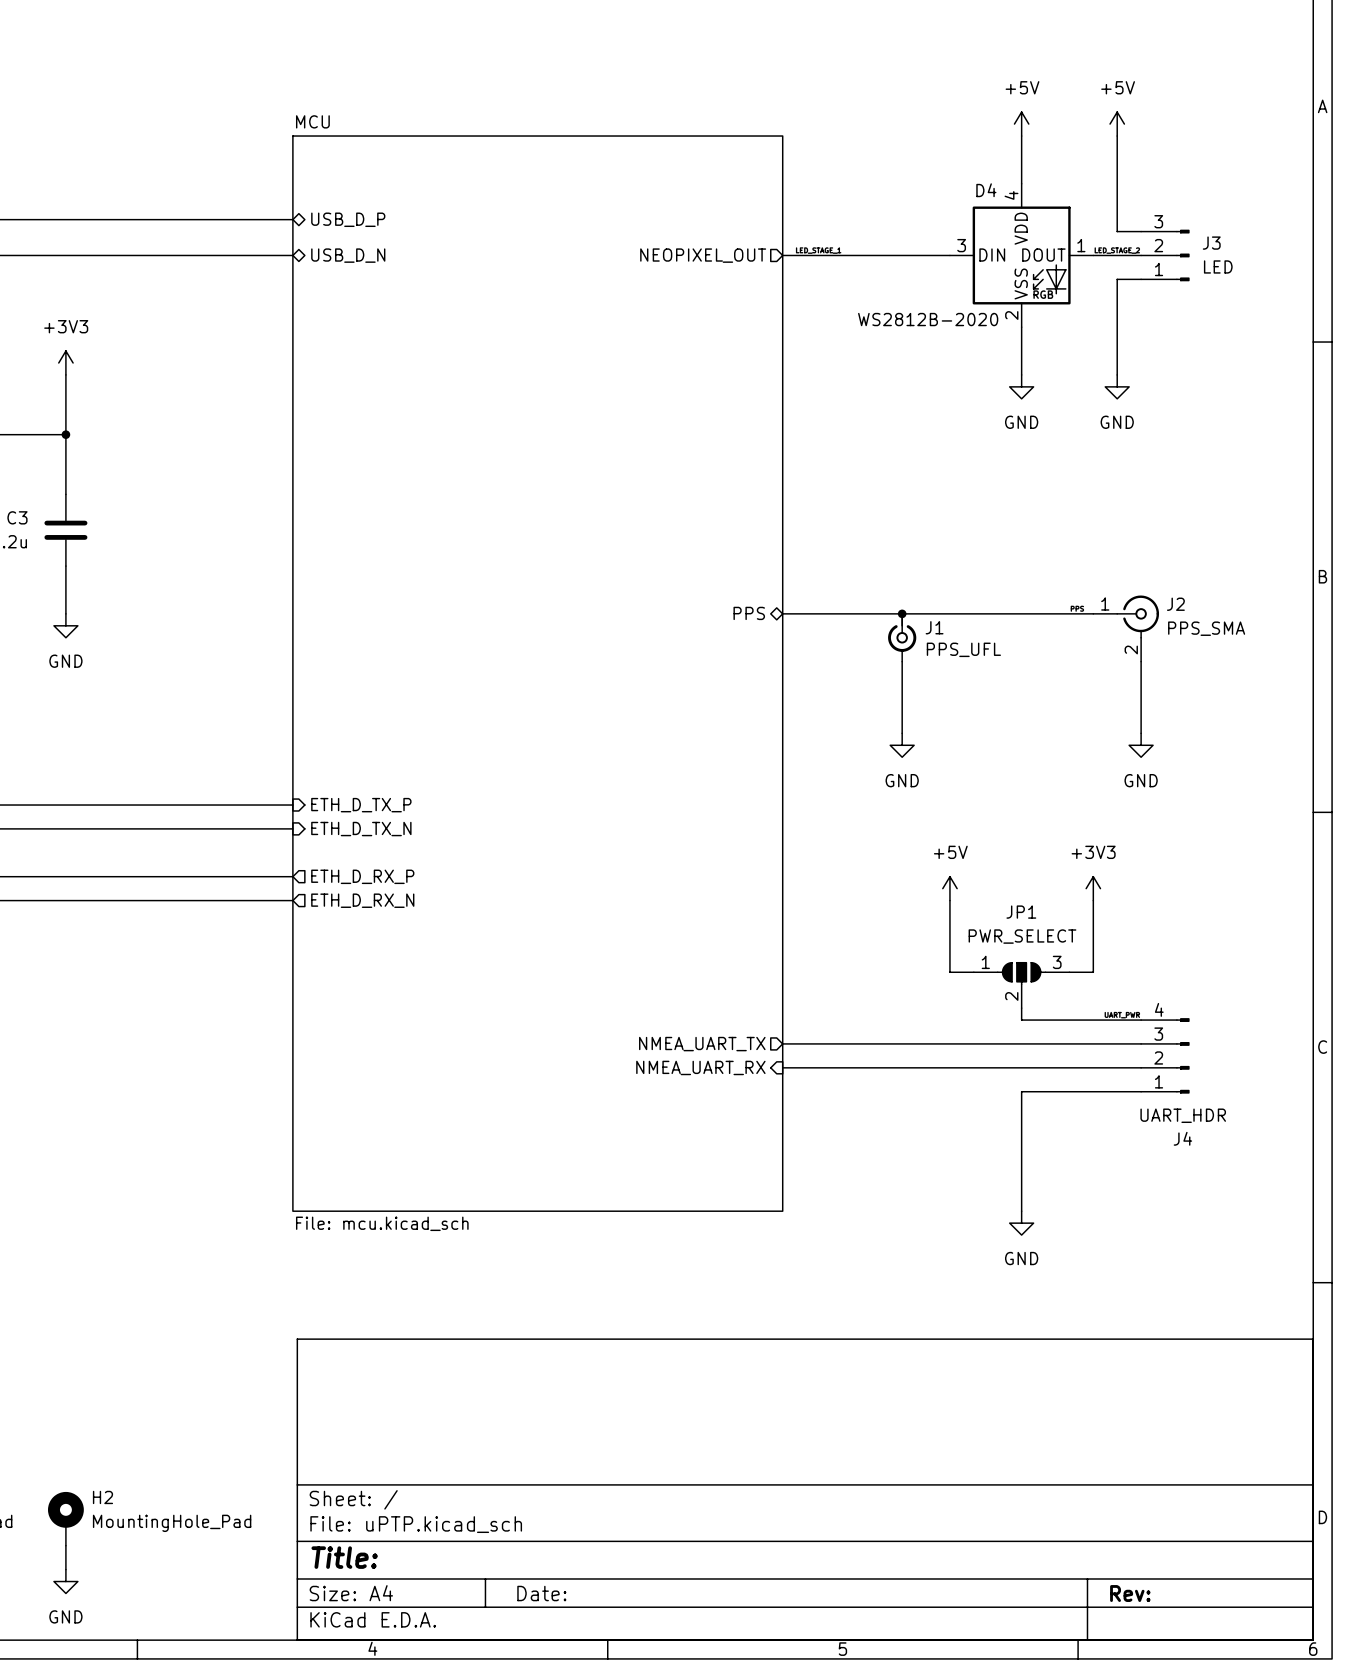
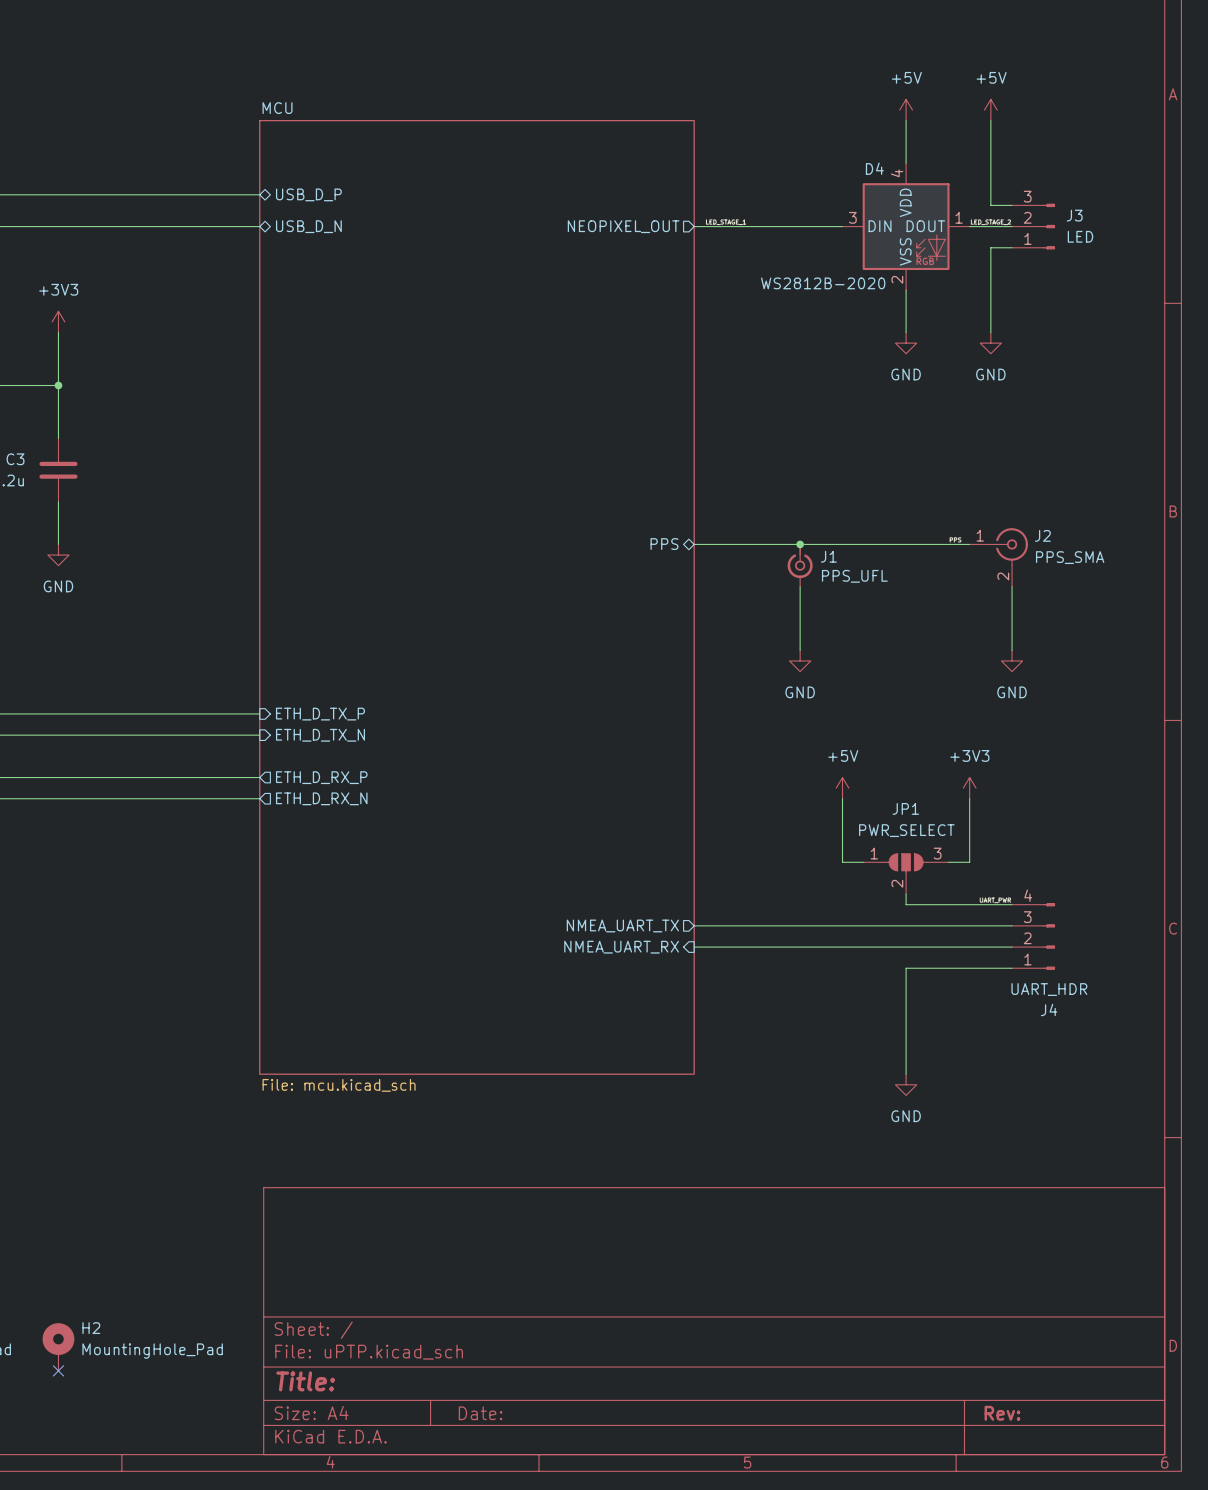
wire: (65, 1545) (65, 1569) -> none
no-connect mark: none -> (58, 1370)
power symbol: GND (65, 1581) -> none

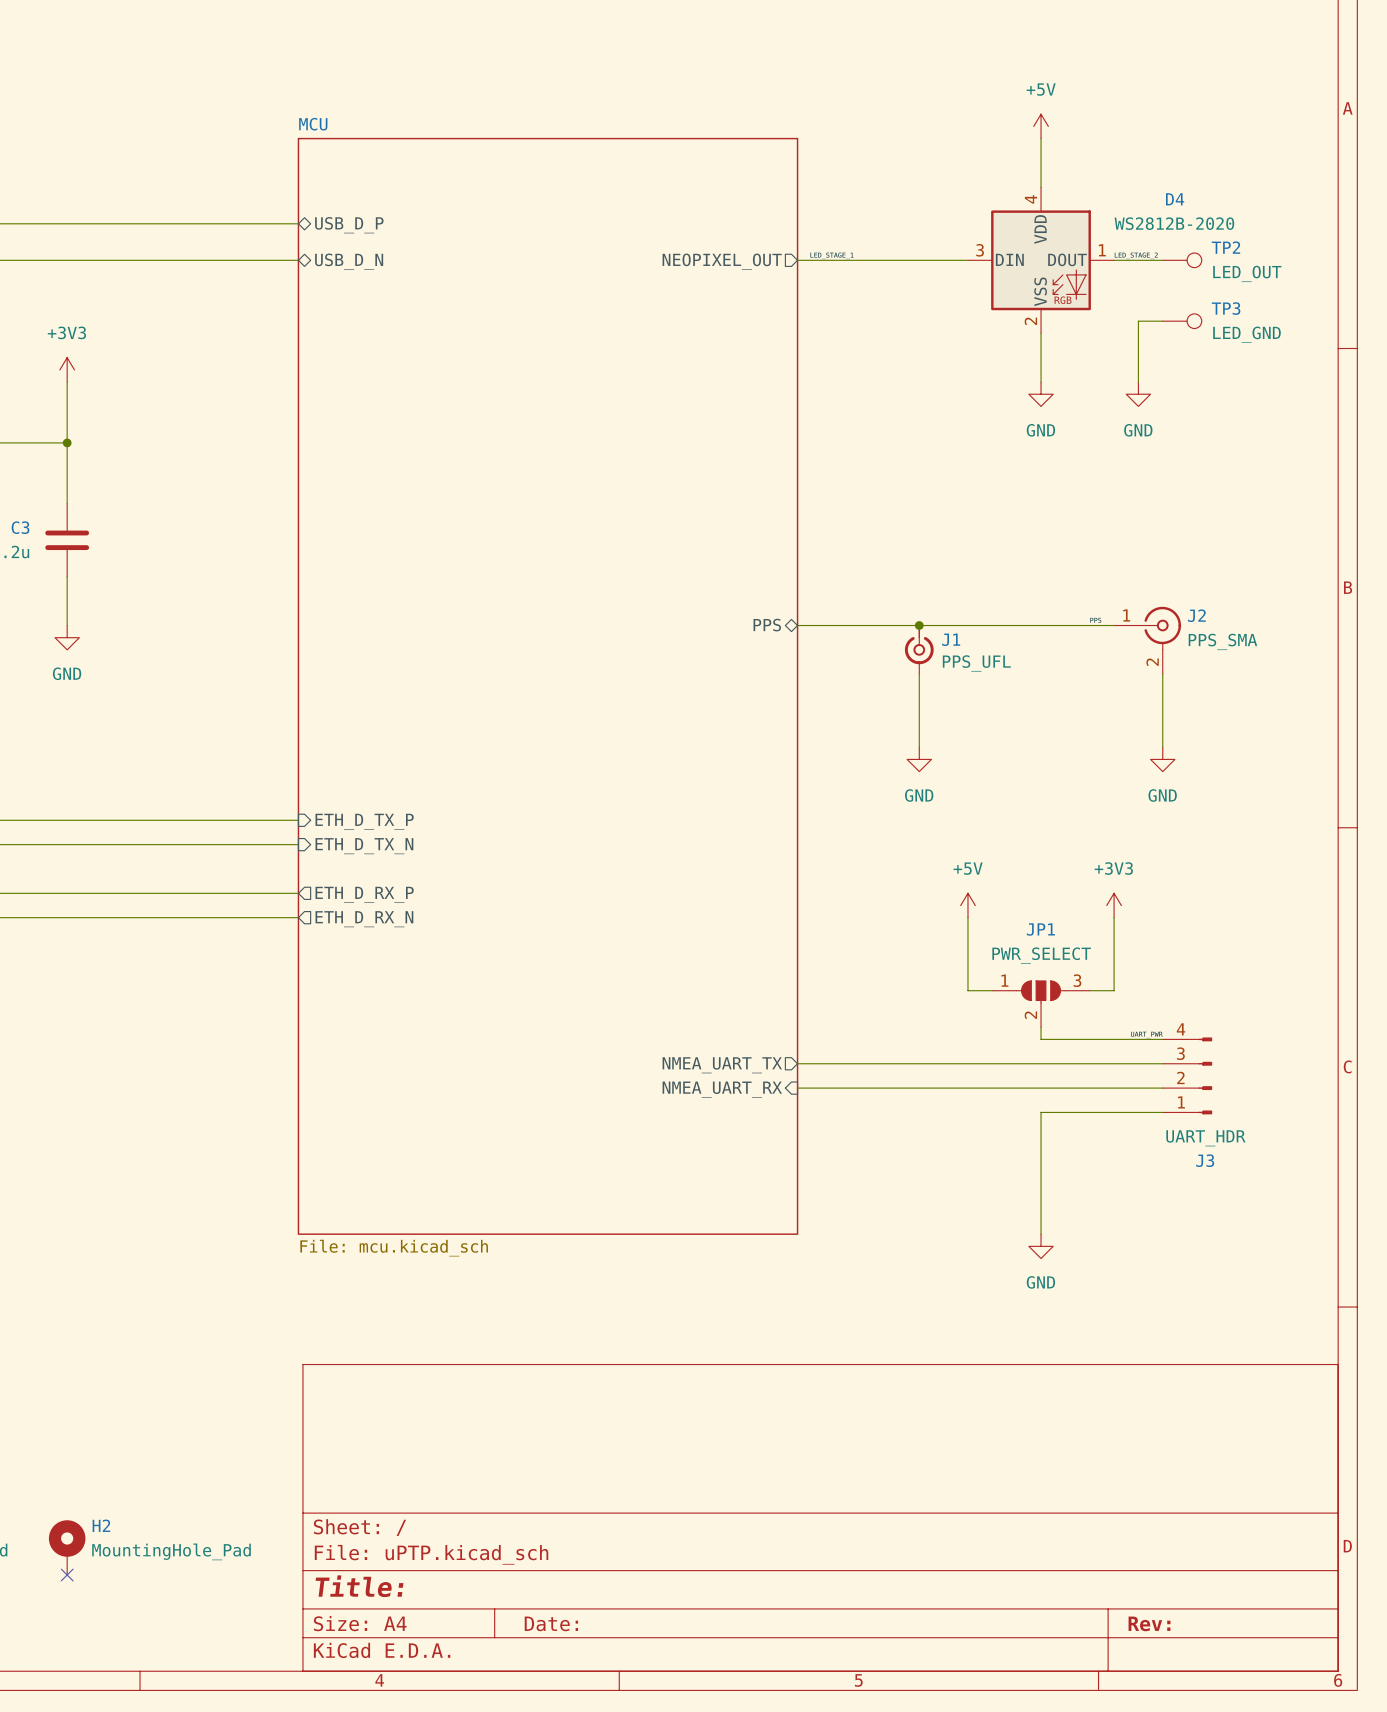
power symbol: +5V (990, 110) -> none
wire: (990, 120) (990, 205) (1012, 205) -> none
D4 name position: D4 (874, 168) -> D4 (1175, 199)
TP2: none -> LED_OUT (1182, 260)
J3: LED (1033, 226) -> none
wire: (1012, 247) (990, 247) (990, 279) -> (1162, 321) (1138, 321)
TP3: none -> LED_GND (1182, 321)
D4 value position: WS2812B-2020 (823, 283) -> WS2812B-2020 (1174, 223)
J4 name: J4 (1049, 1009) -> J3 (1205, 1160)

